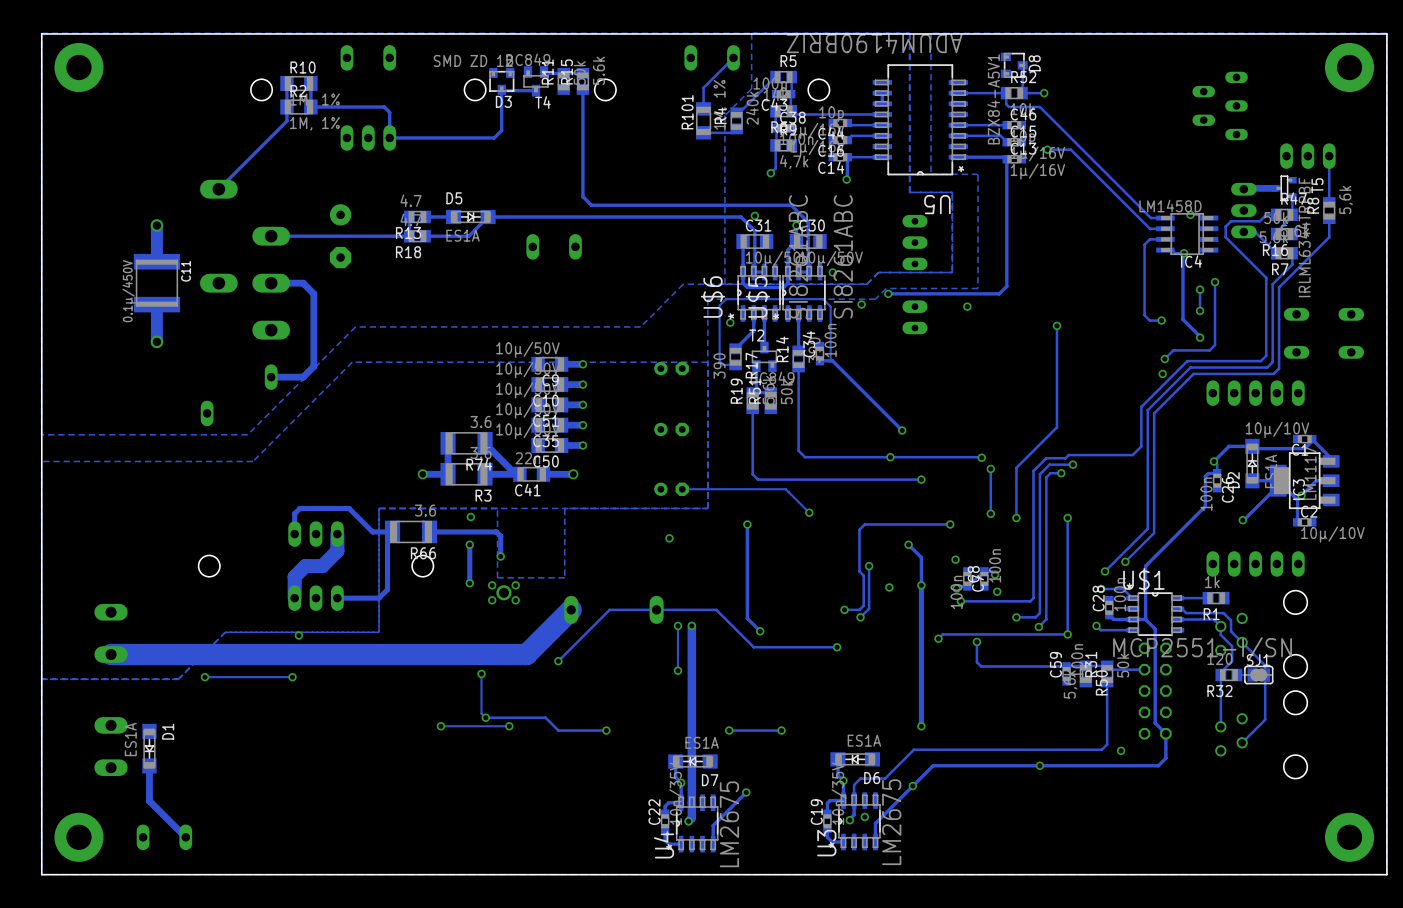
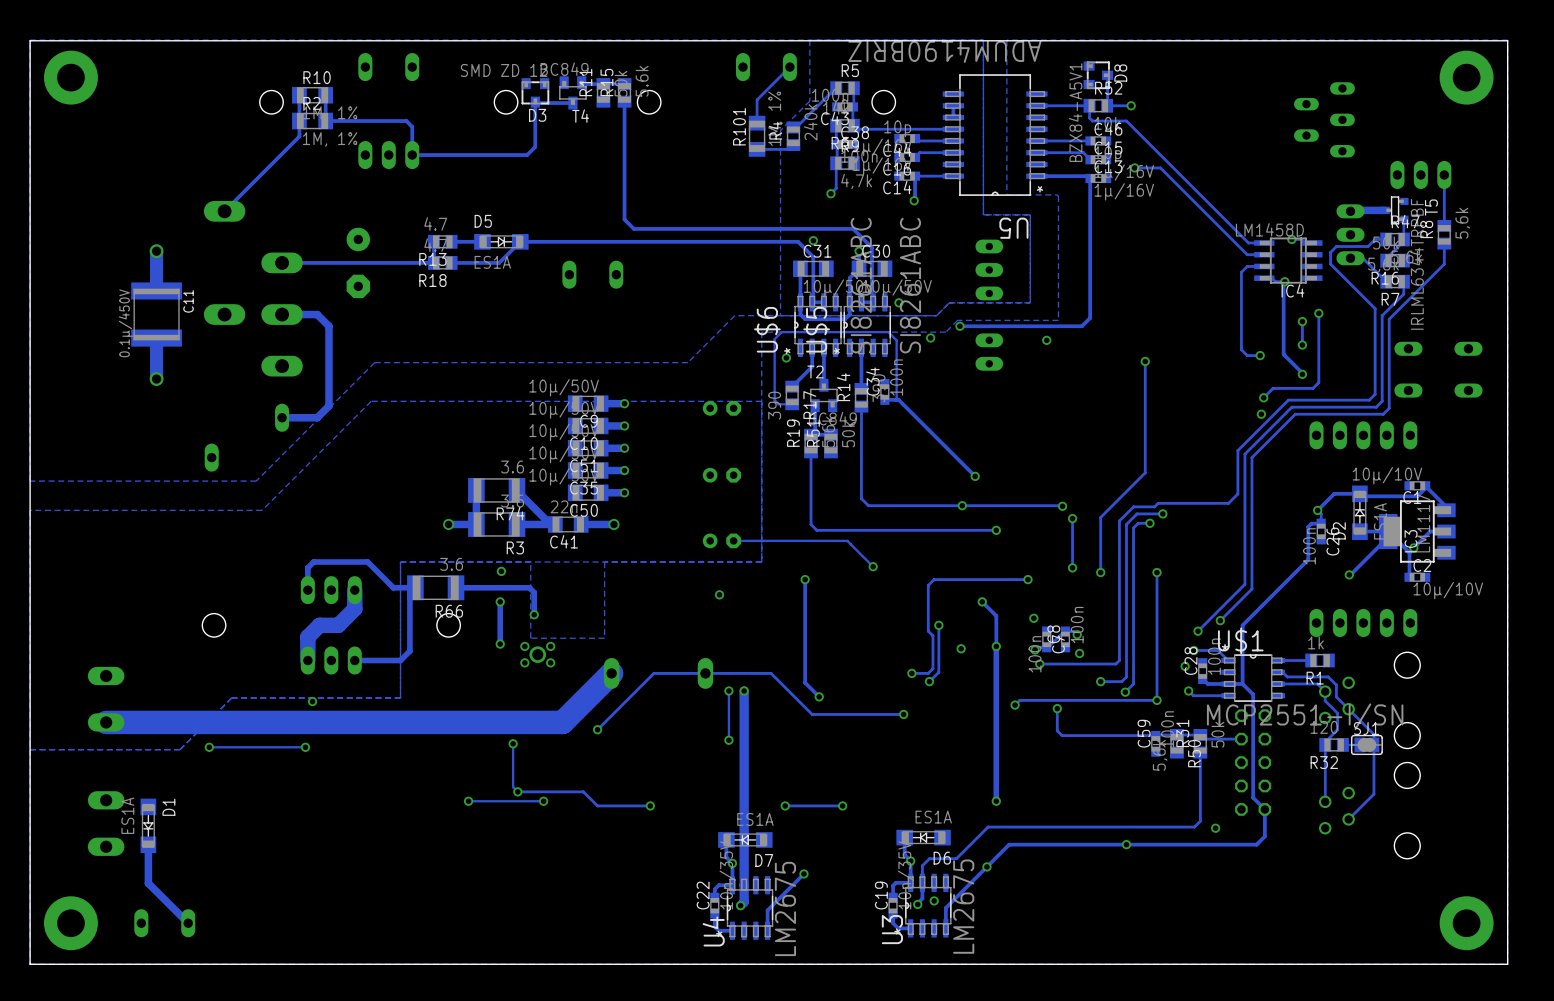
via: none -> (1185, 666)

